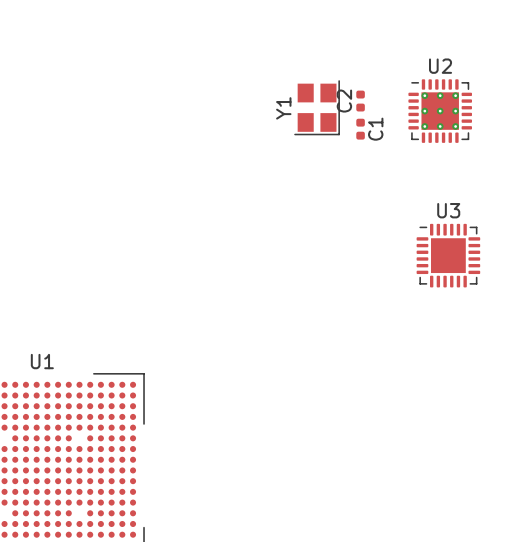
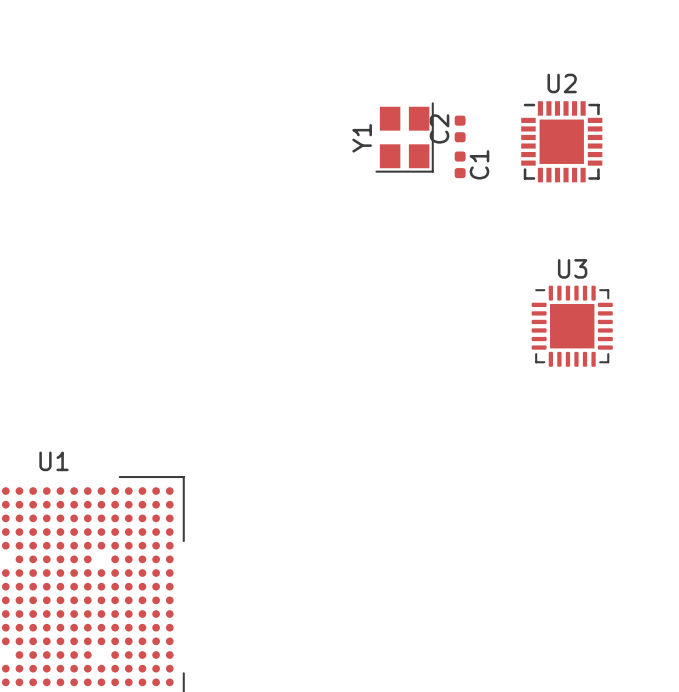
U2 footprint: [408, 79, 472, 143] -> [521, 101, 603, 183]

